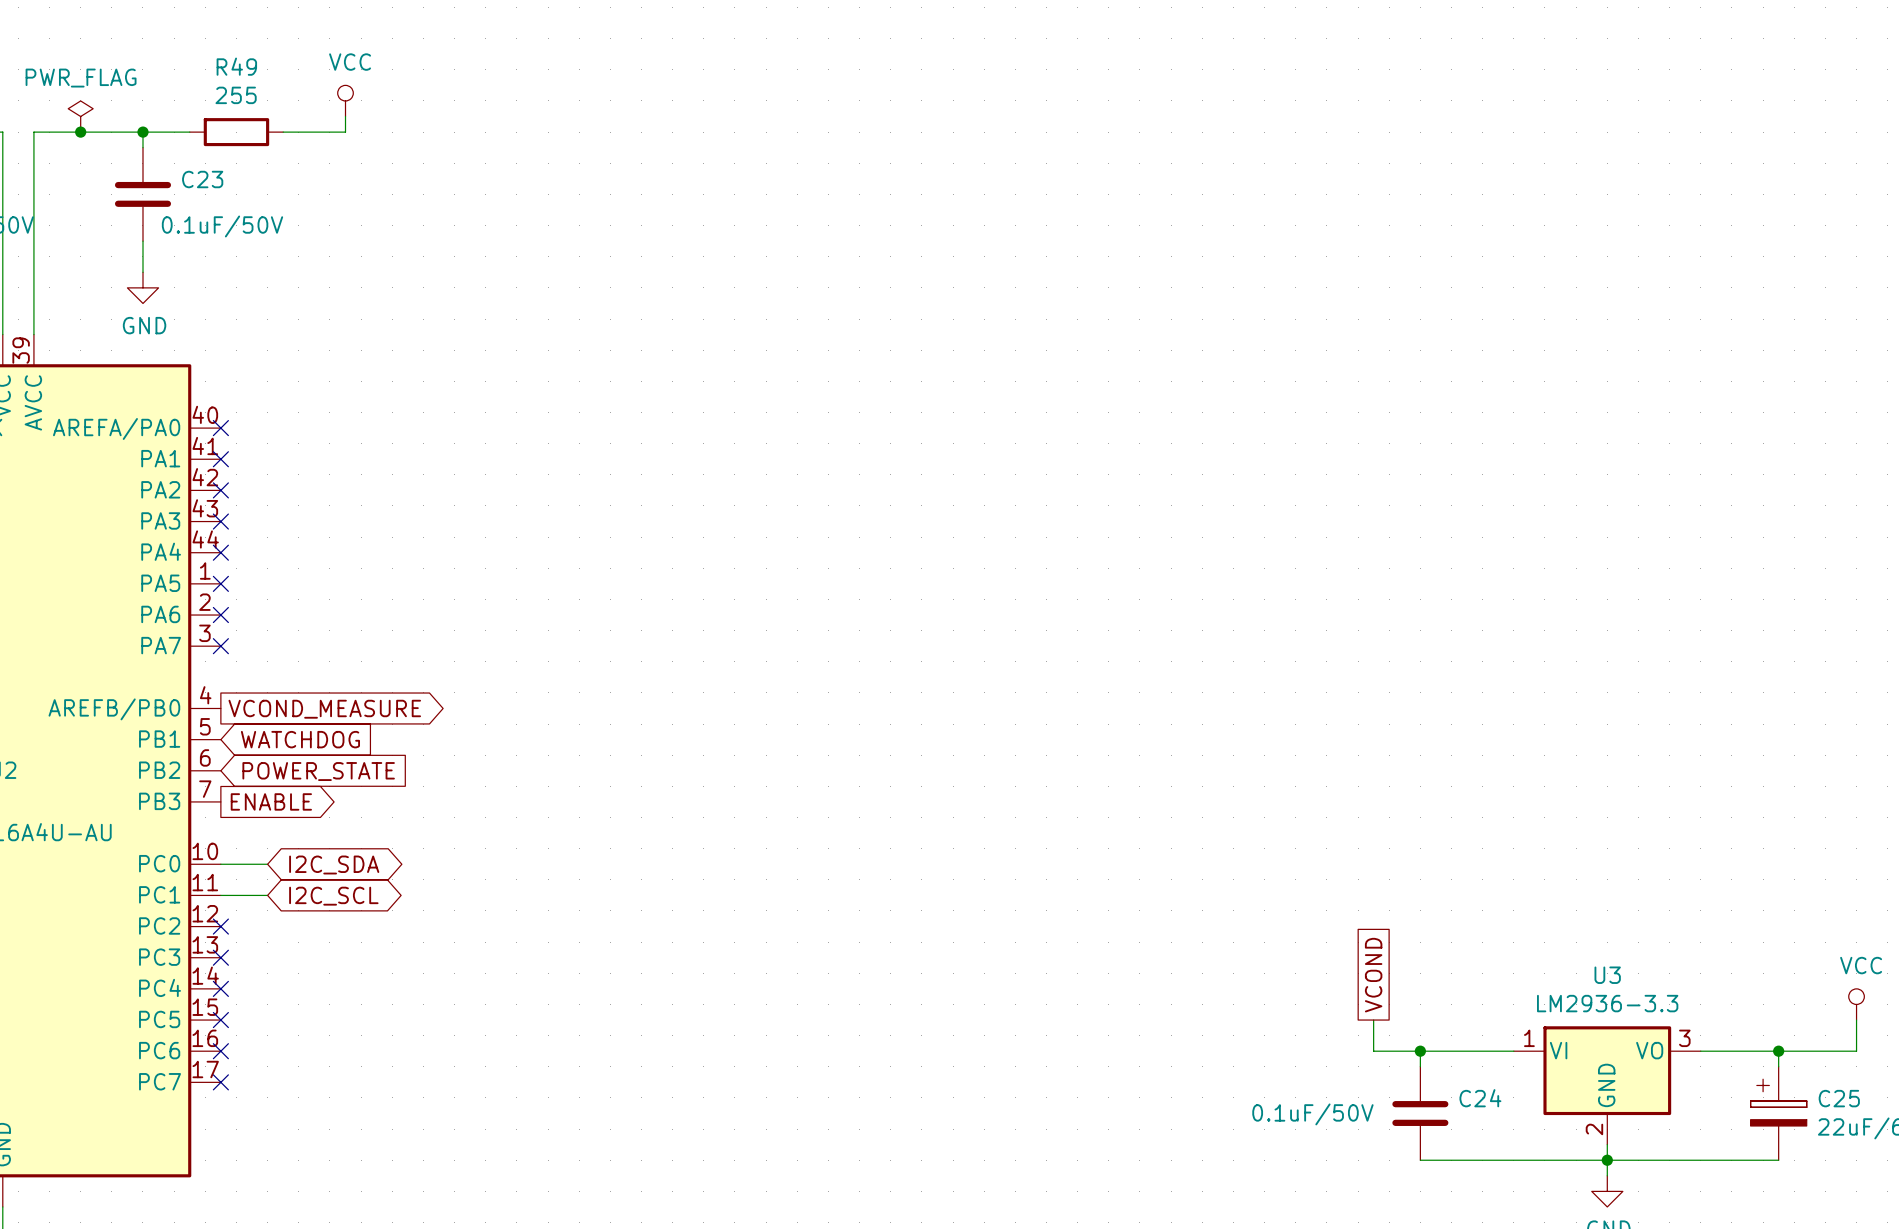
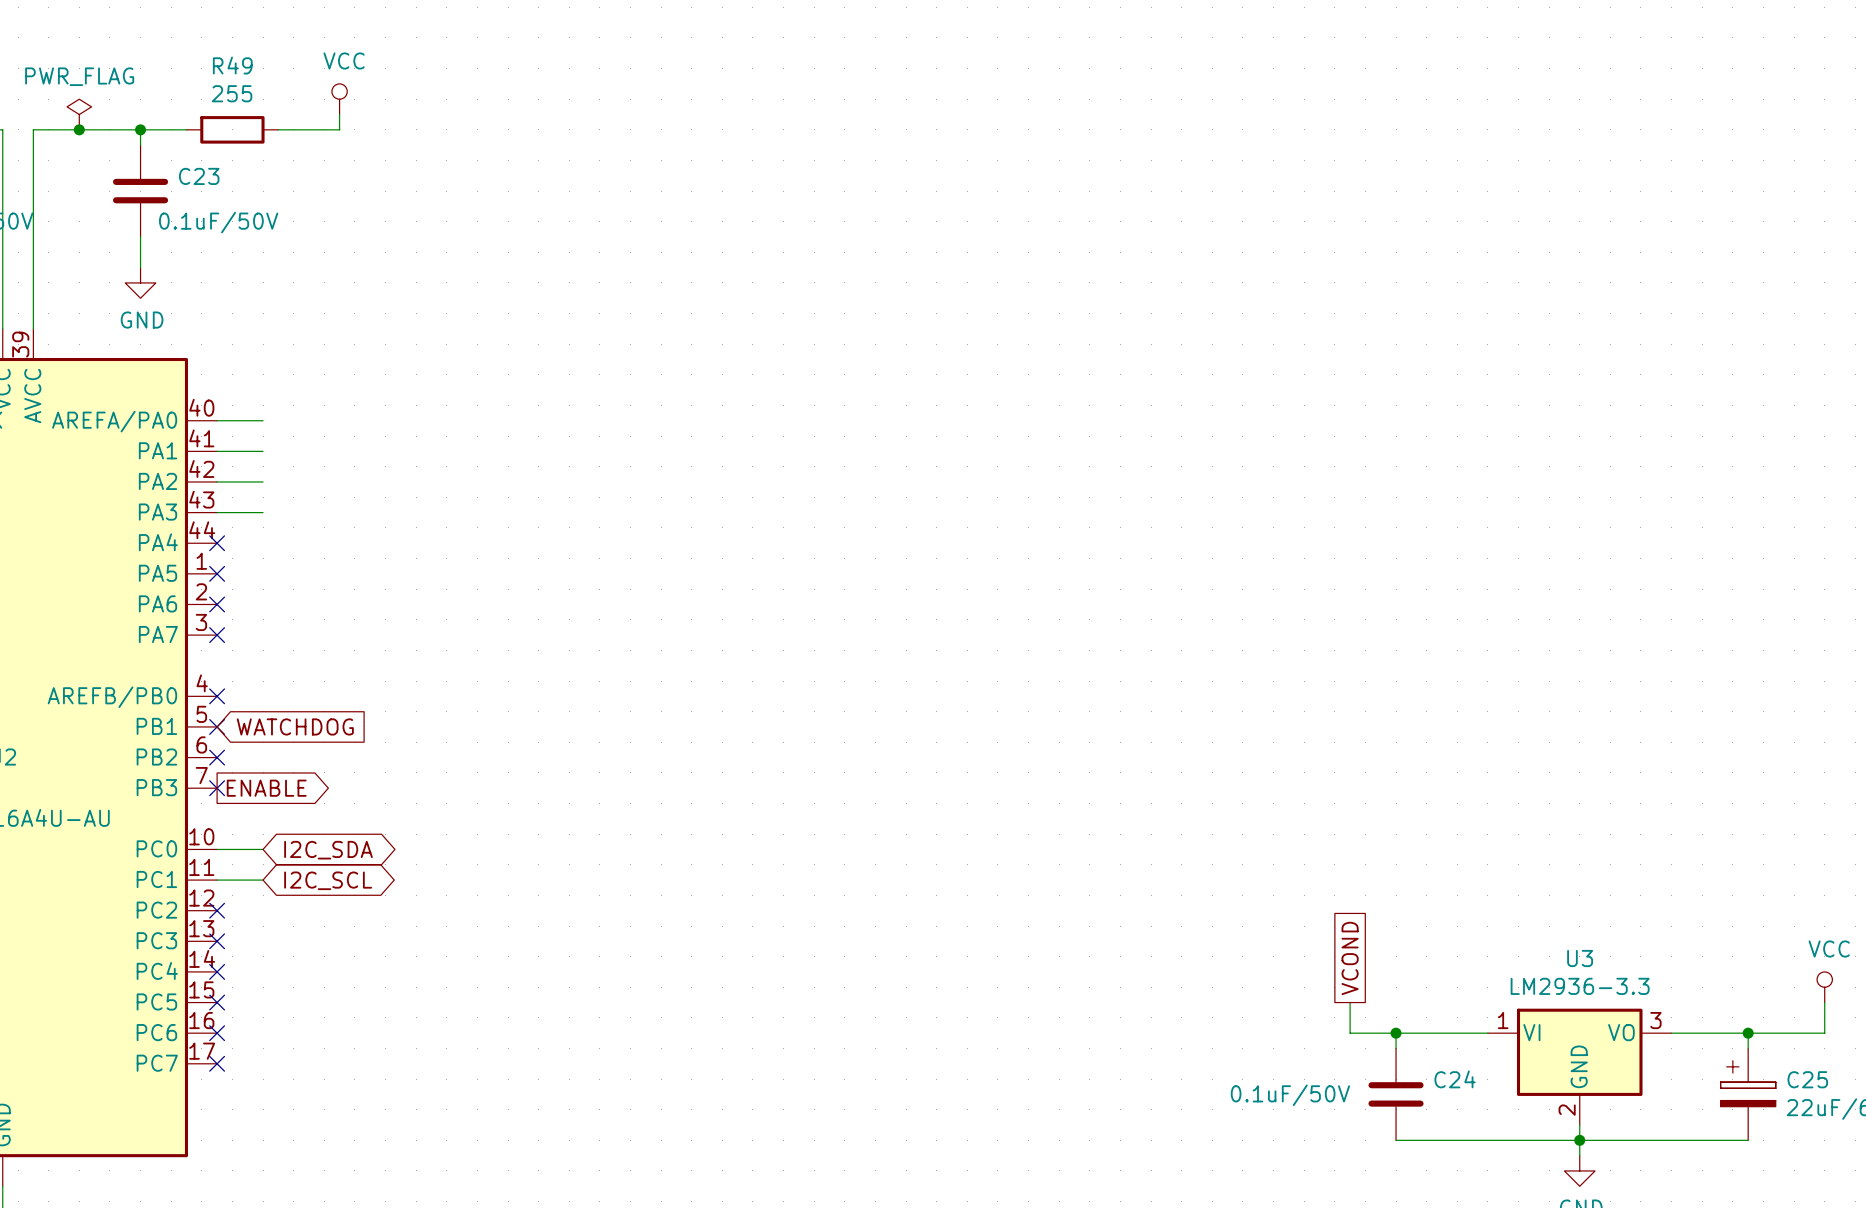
wire: none -> (217, 420) (263, 420)
no-connect mark: (220, 428) -> none
wire: none -> (217, 451) (263, 451)
no-connect mark: (220, 459) -> none
wire: none -> (217, 481) (263, 481)
no-connect mark: (220, 490) -> none
wire: none -> (217, 512) (263, 512)
no-connect mark: (220, 521) -> none
no-connect mark: none -> (217, 696)
global label: VCOND_MEASURE (324, 709) -> none
no-connect mark: none -> (217, 726)
no-connect mark: none -> (217, 757)
global label: POWER_STATE (318, 771) -> none
no-connect mark: none -> (217, 788)

